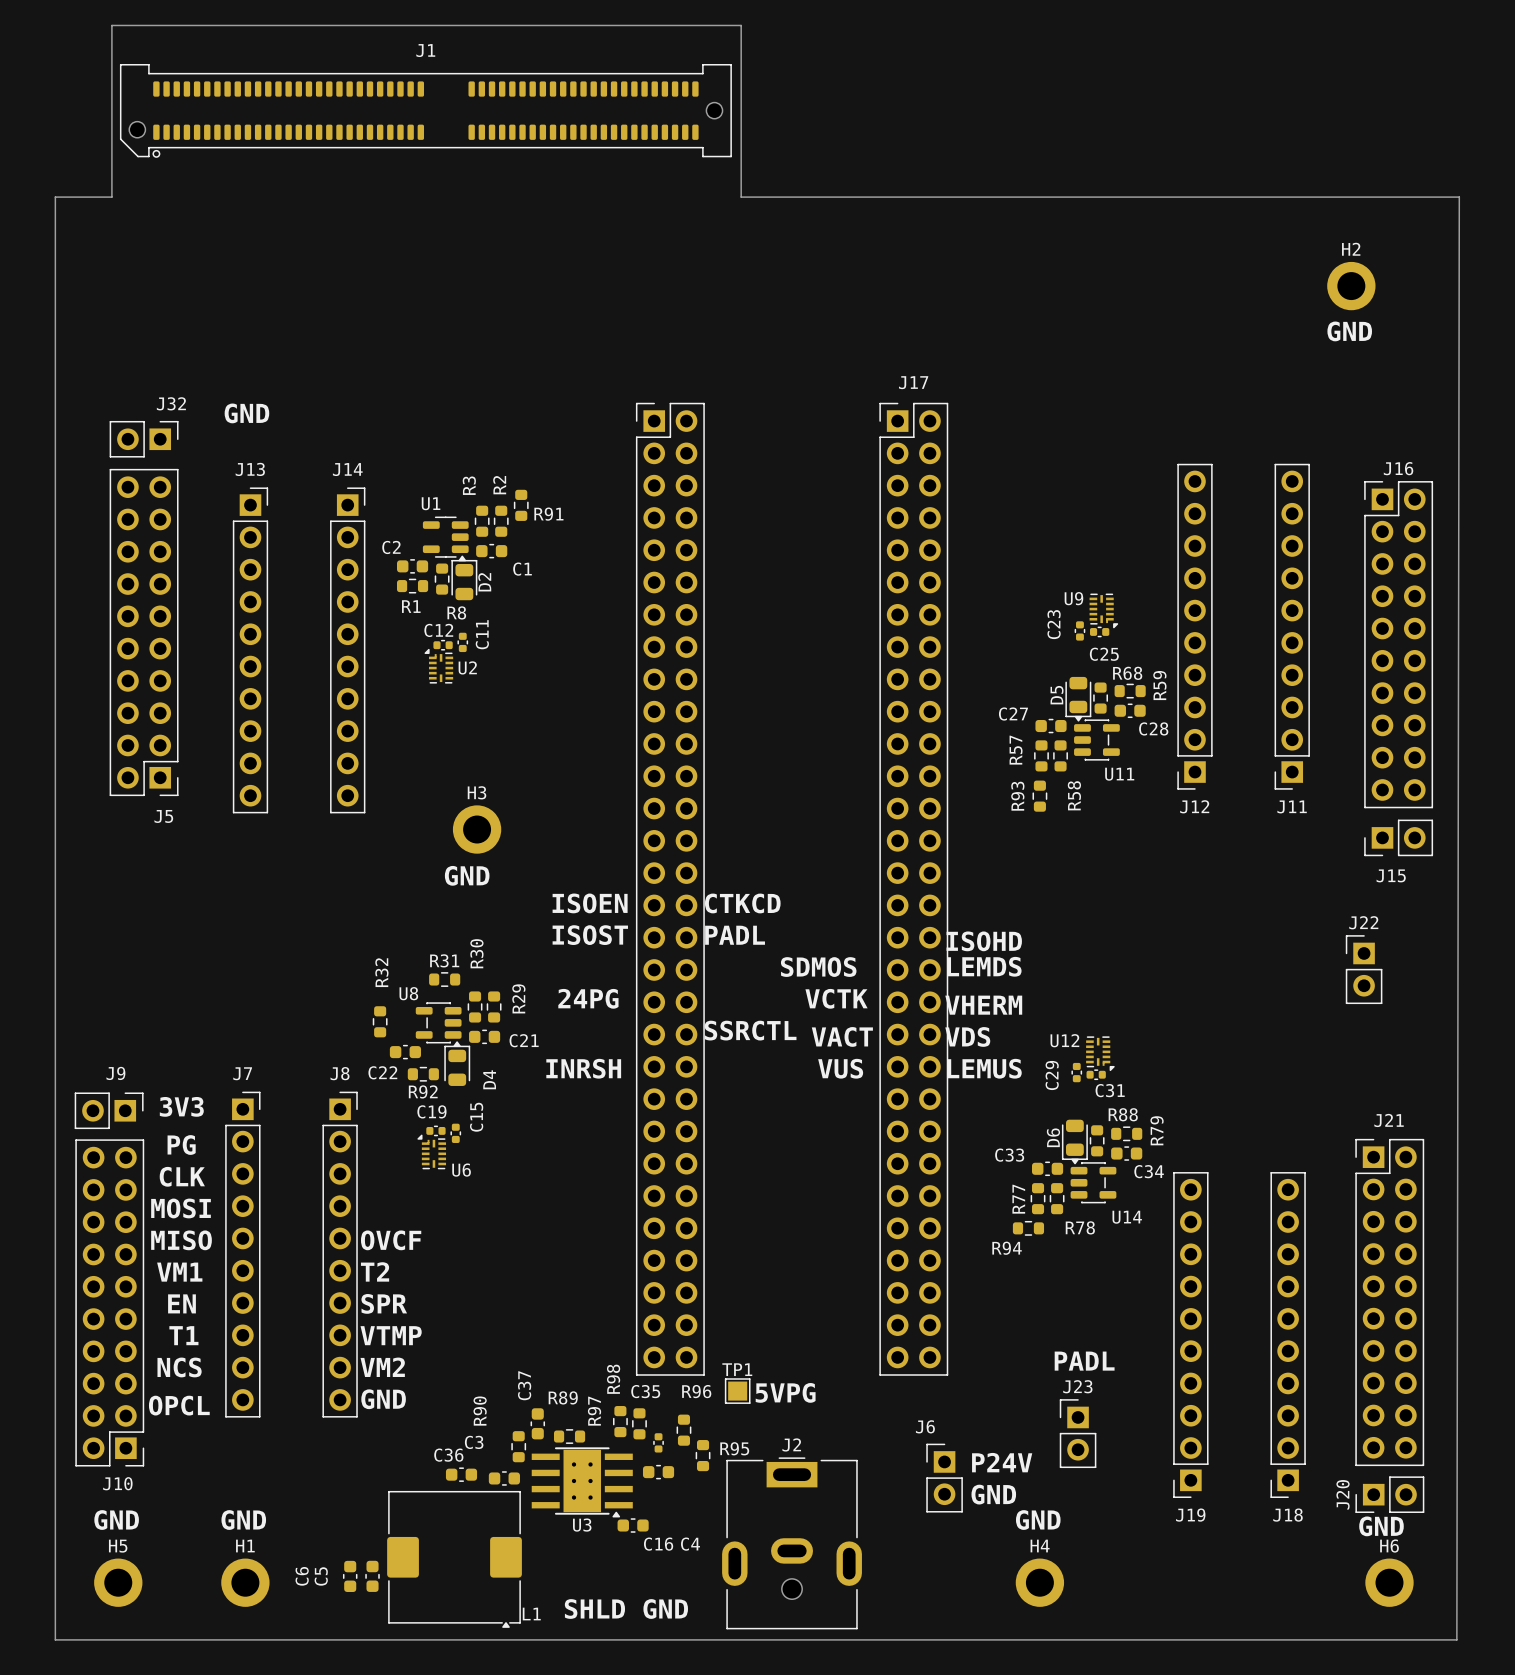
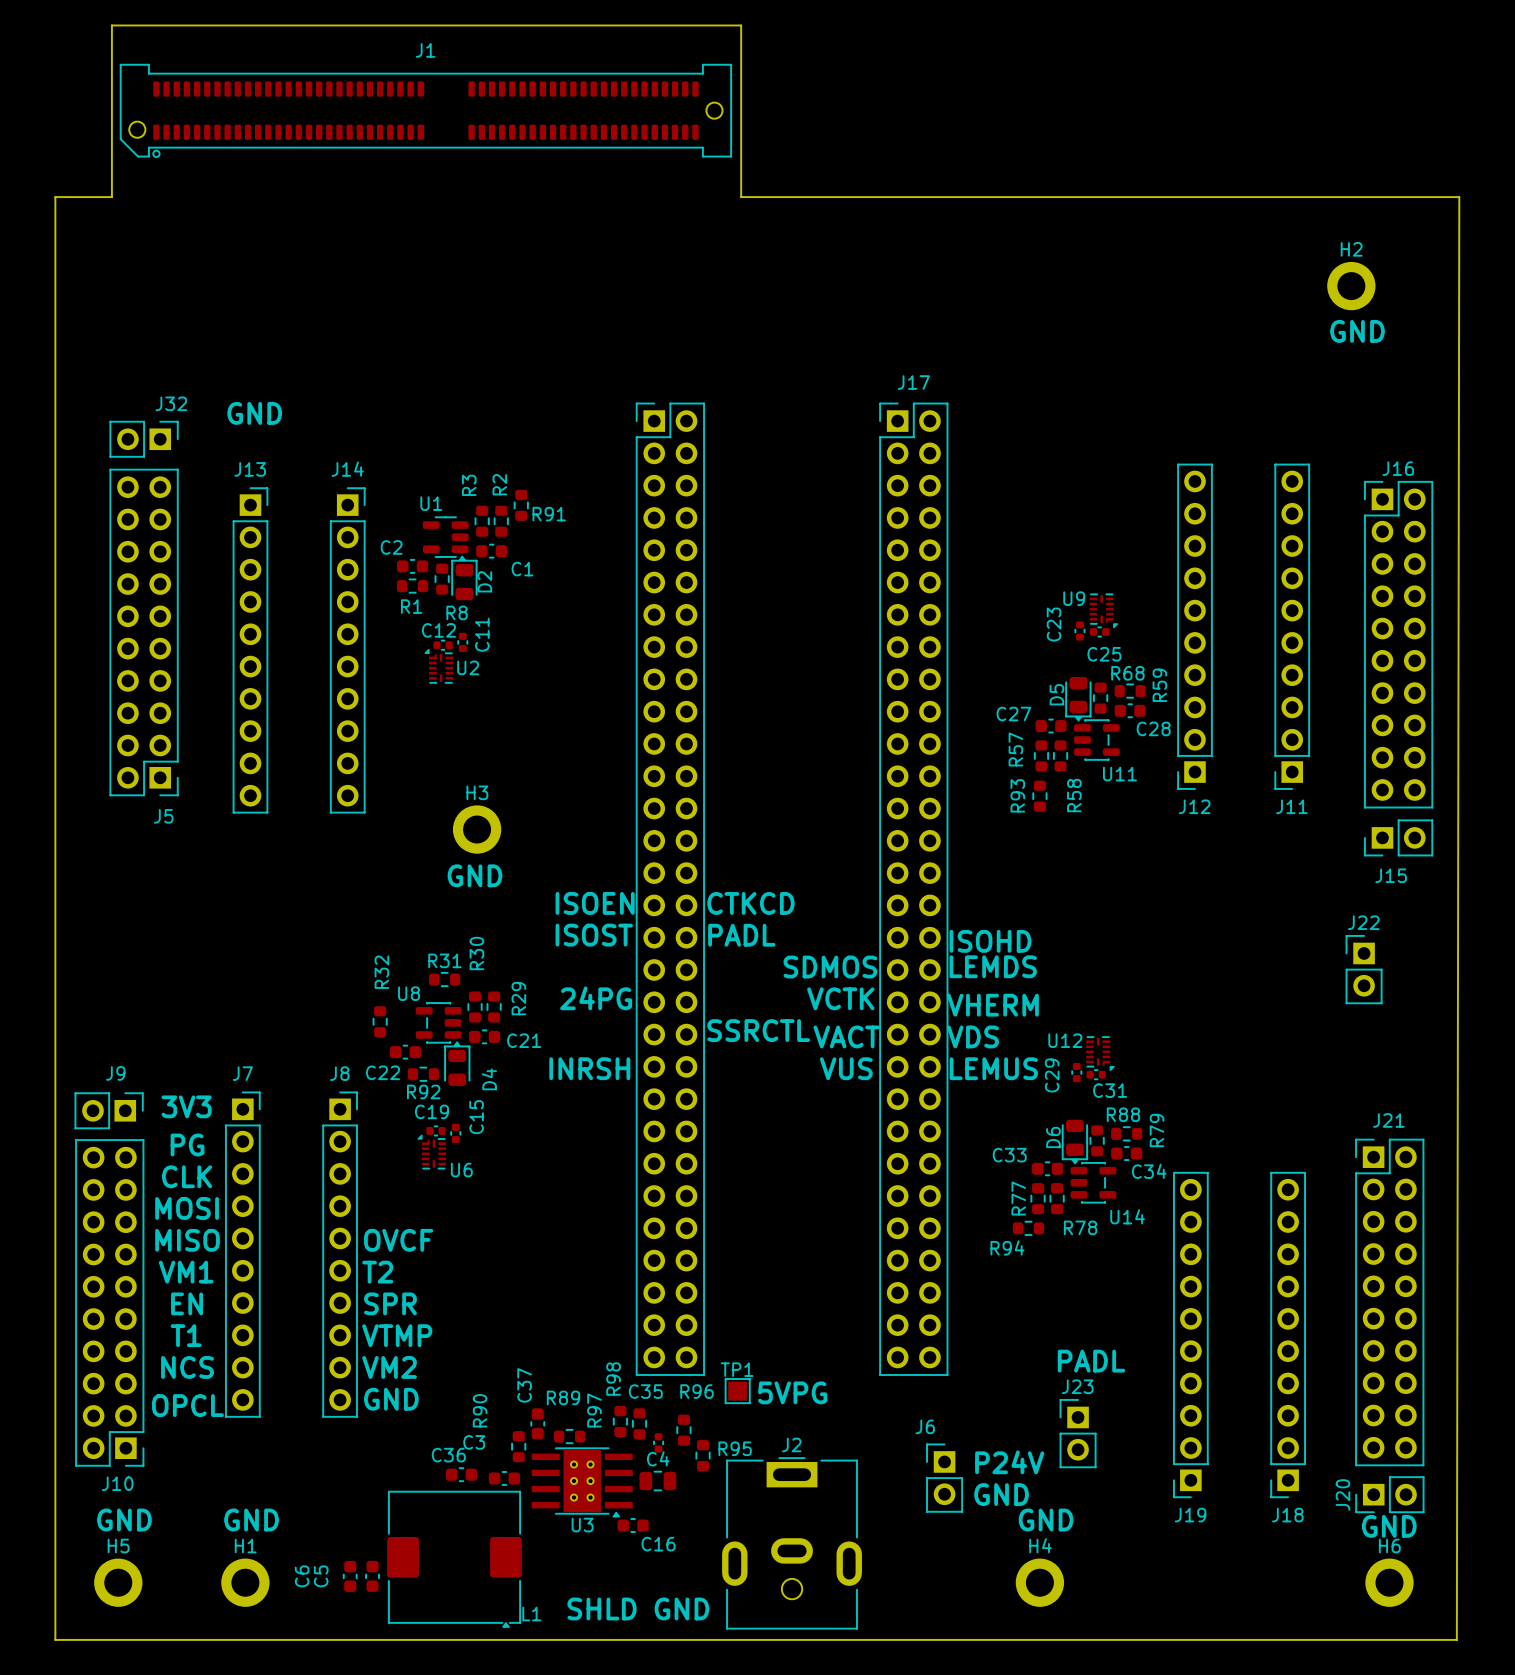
C4 footprint: [642, 1464, 675, 1480] -> [639, 1470, 677, 1492]
C4 name position: C4 (690, 1544) -> C4 (658, 1458)

